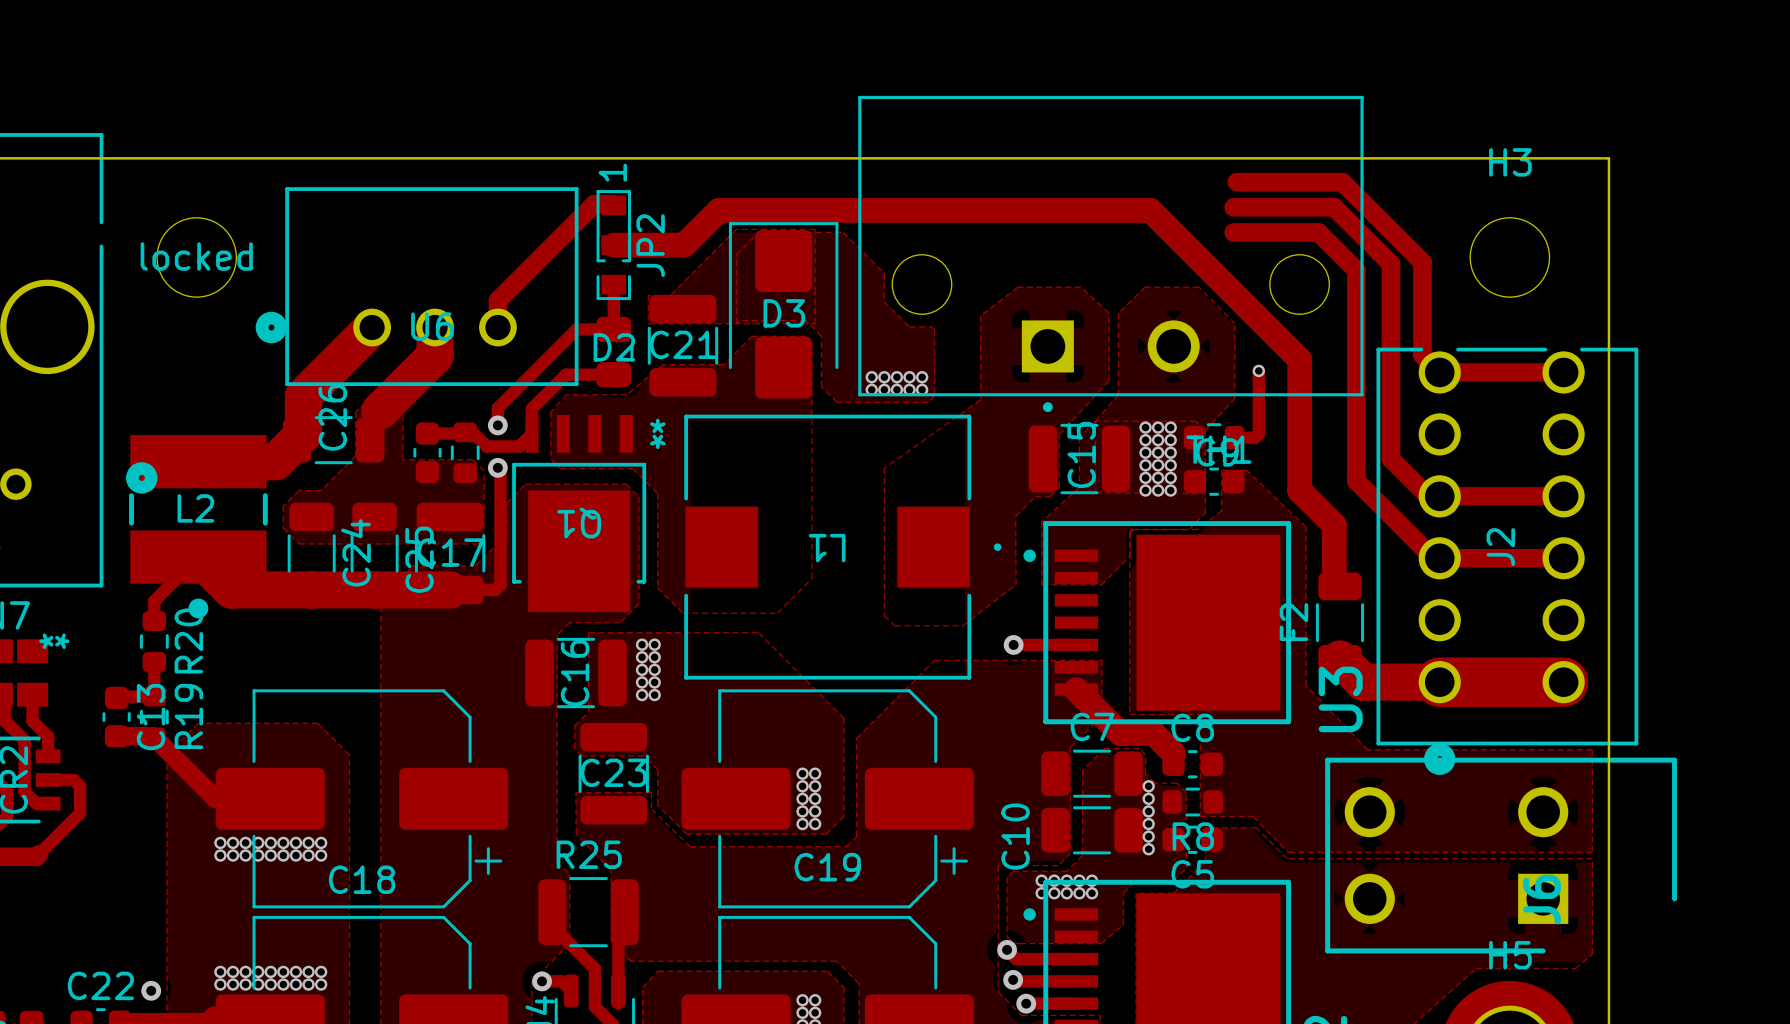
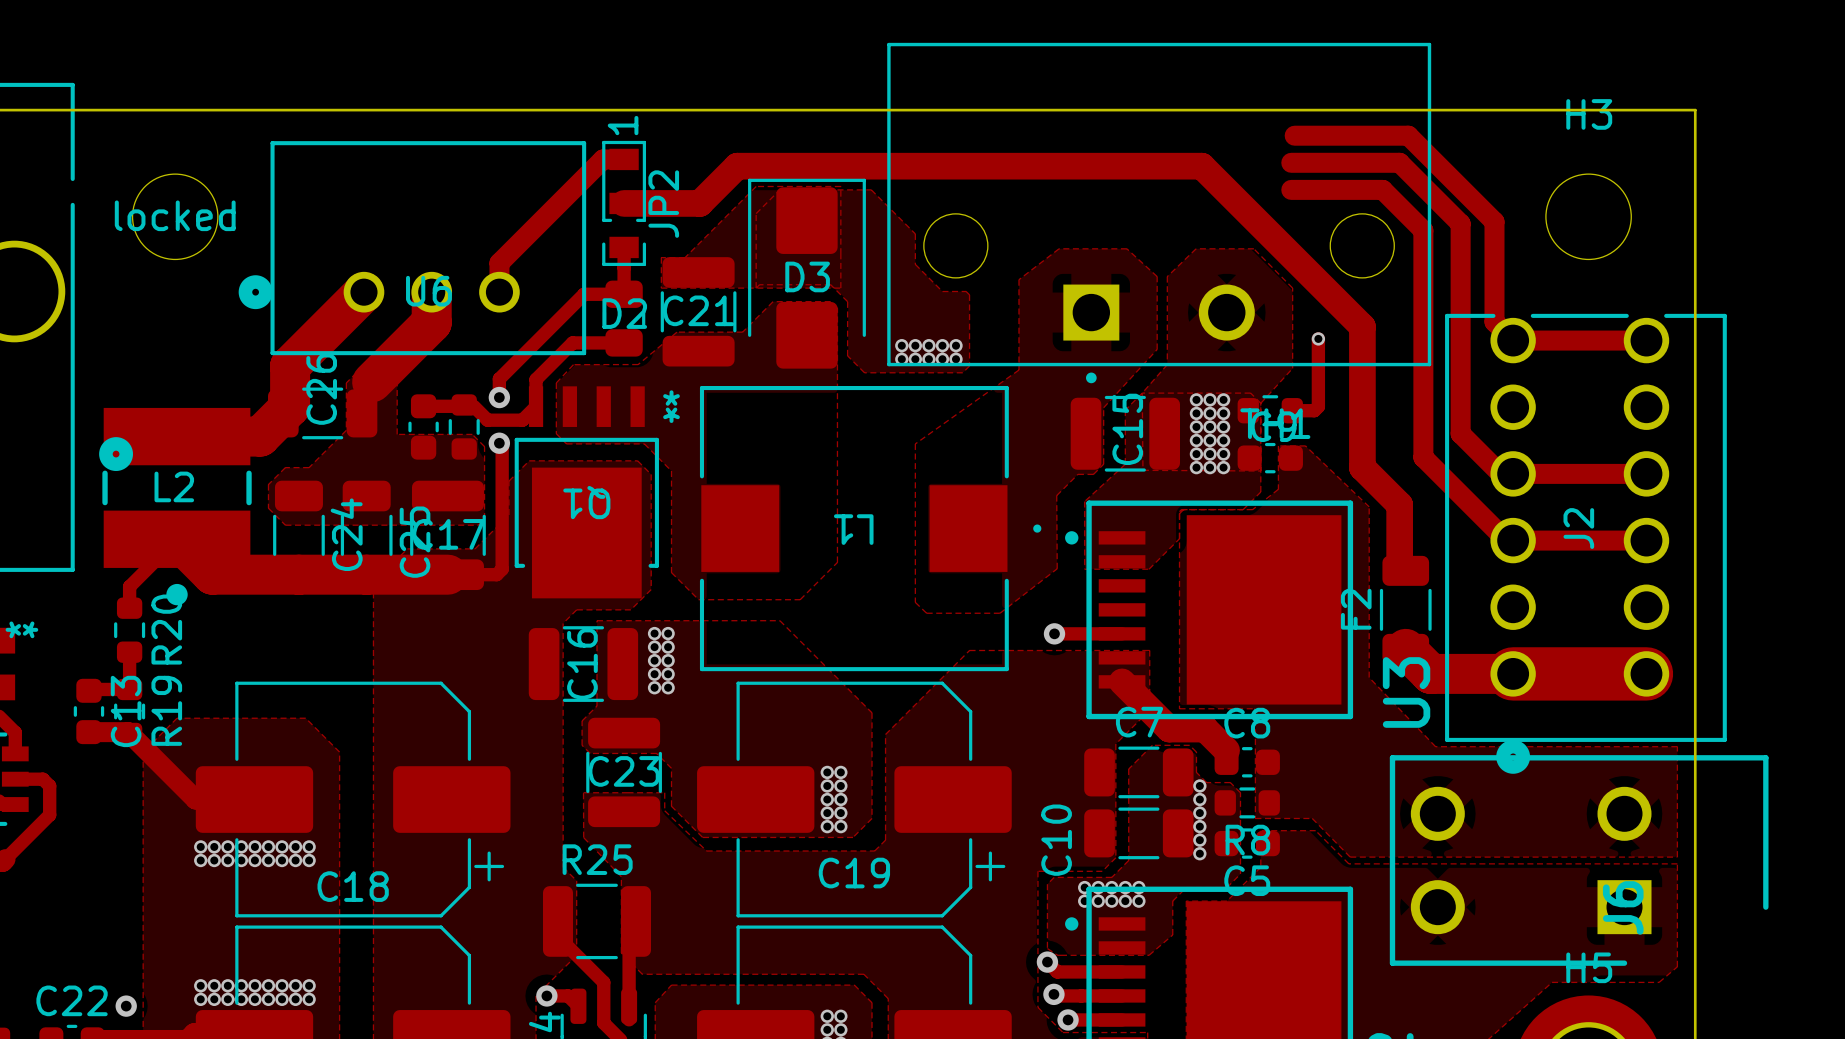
JP2 footprint: [596, 190, 631, 301] -> [602, 140, 647, 267]

